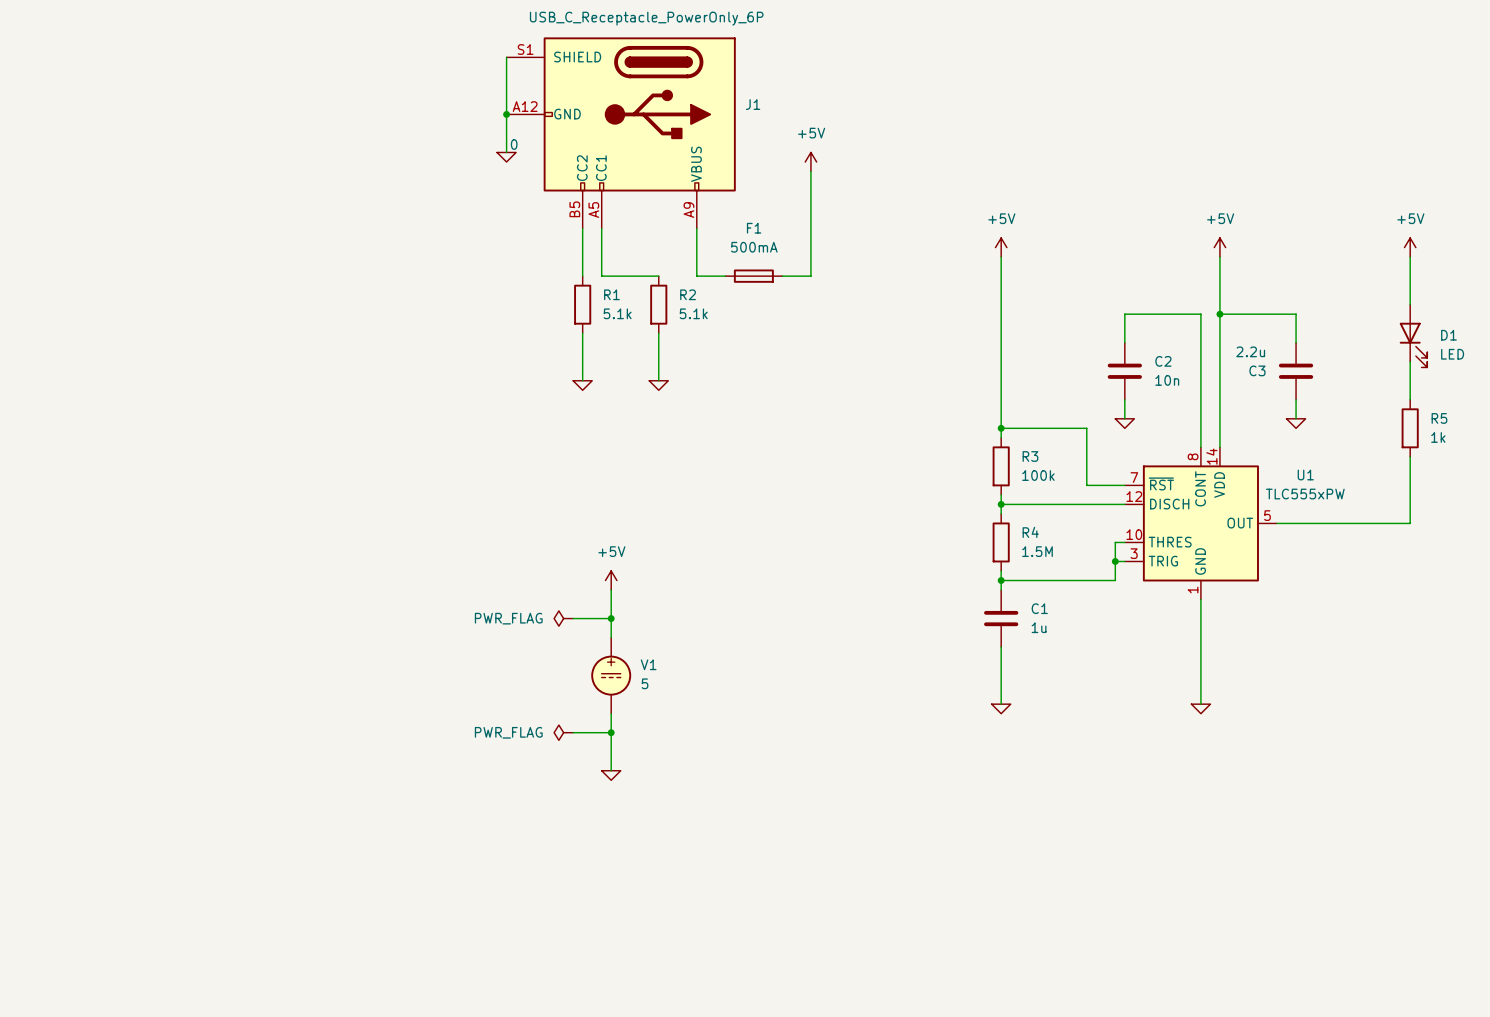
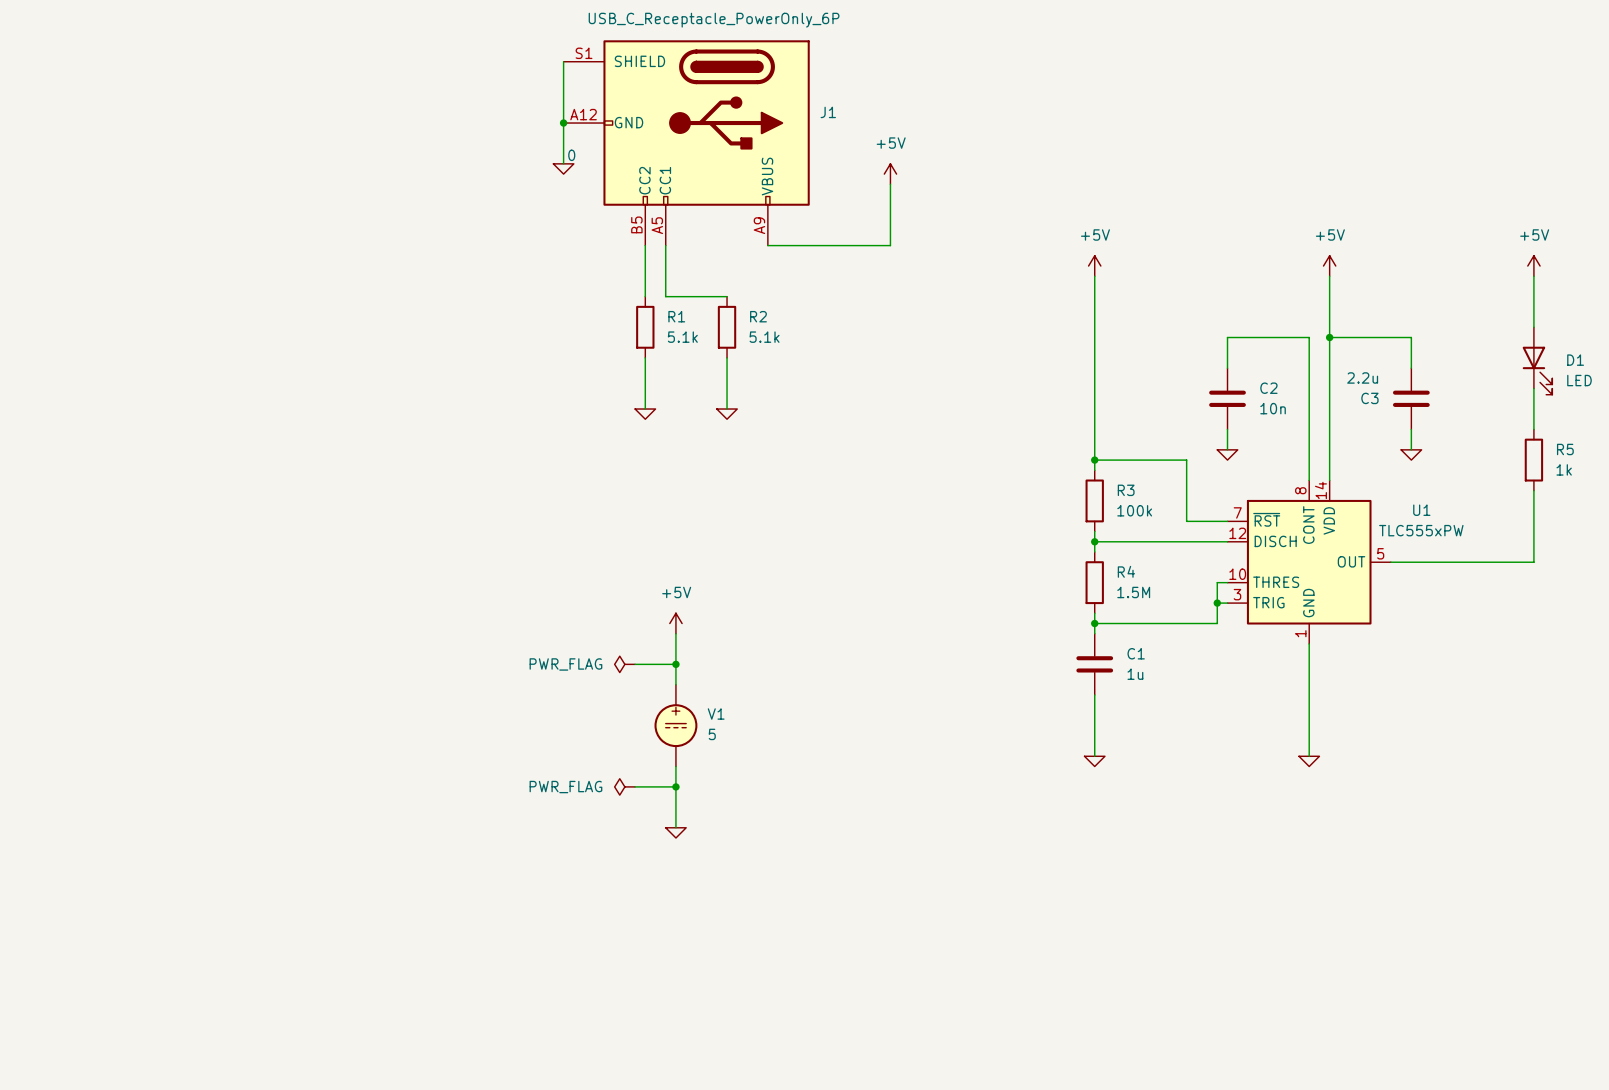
wire: (696, 228) (696, 276) (725, 276) -> (767, 245) (890, 245)
wire: (810, 228) (810, 276) (782, 276) -> none
F1: 500mA (753, 276) -> none

